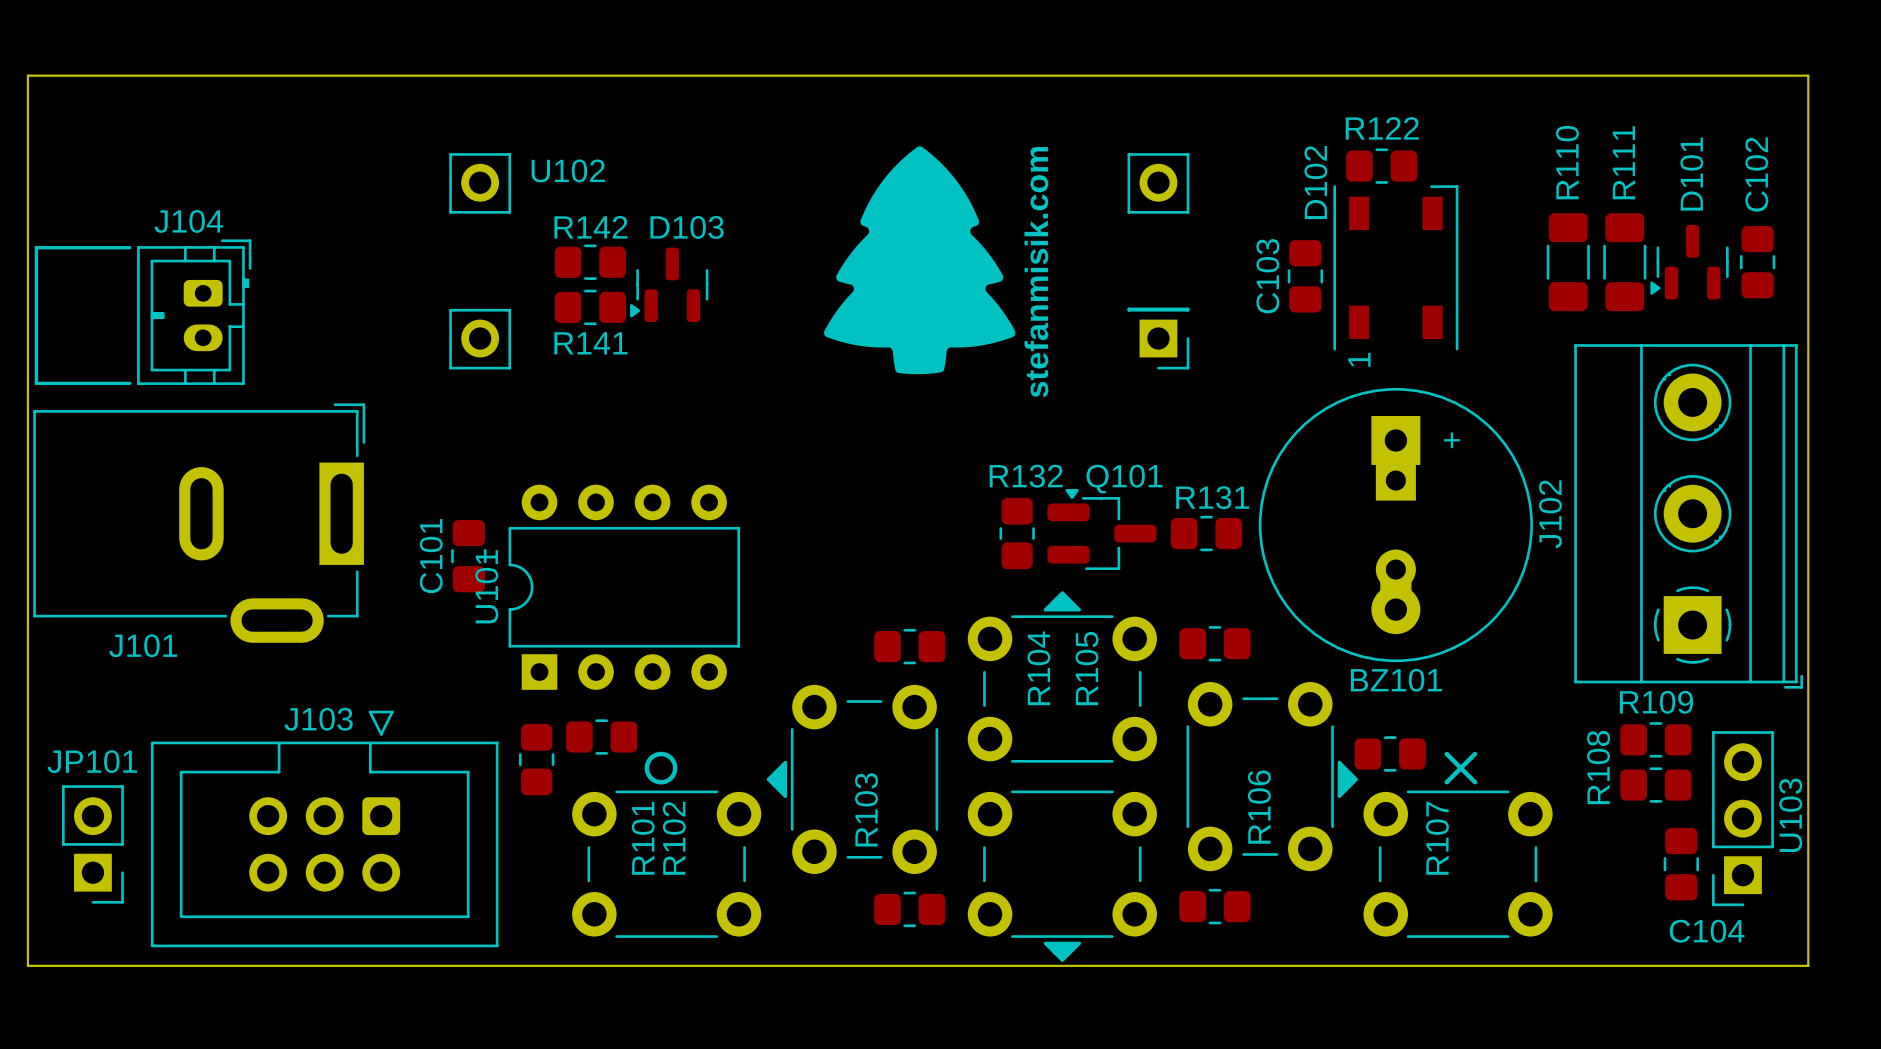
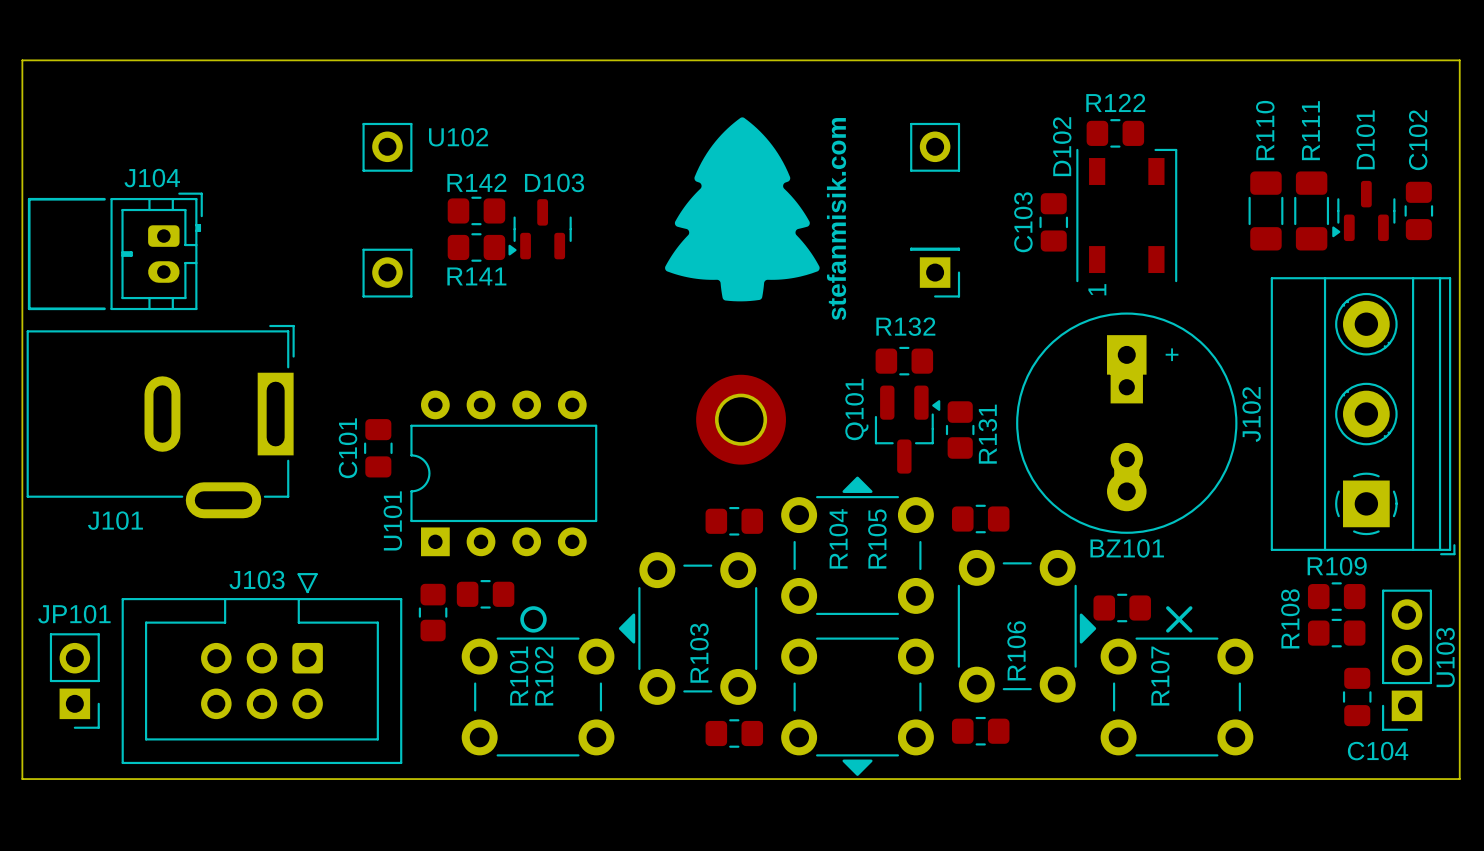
Q101 name position: Q101 (1124, 479) -> Q101 (856, 409)
part: none -> (741, 419)
Q101 rotation: 0° (1101, 529) -> 90° clockwise (907, 429)
R132 rotation: 0° (1017, 533) -> 90° clockwise (904, 361)
R132 position: (1017, 533) -> (904, 361)
R131 rotation: 0° (1206, 533) -> 90° clockwise (960, 430)
U101 name position: U101 (486, 586) -> U101 (392, 520)

